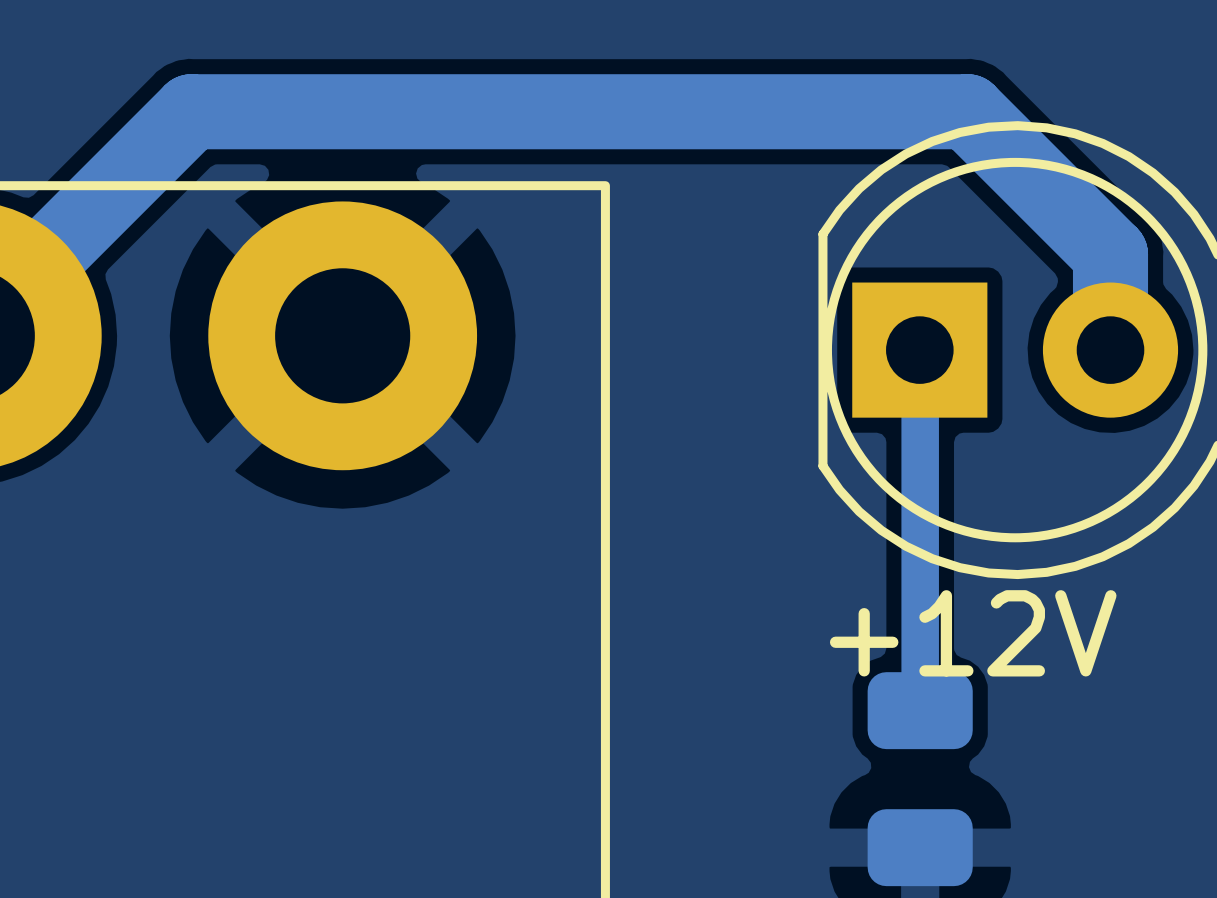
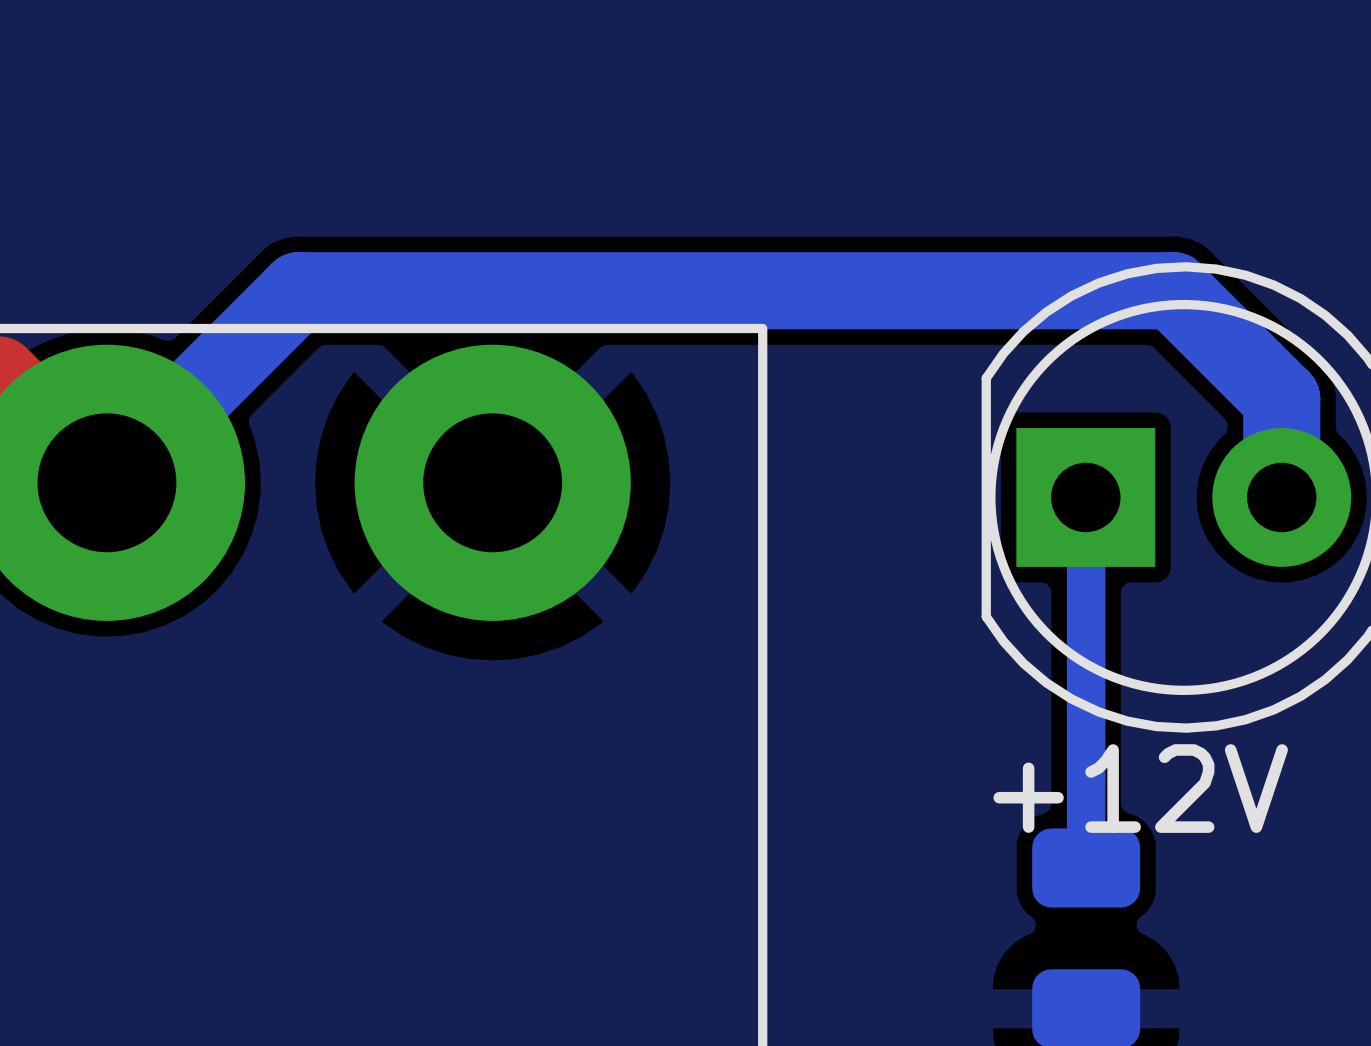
bottom track: (154, 148) (191, 111) (967, 111) (1004, 148) -> (298, 290) (1173, 290)

